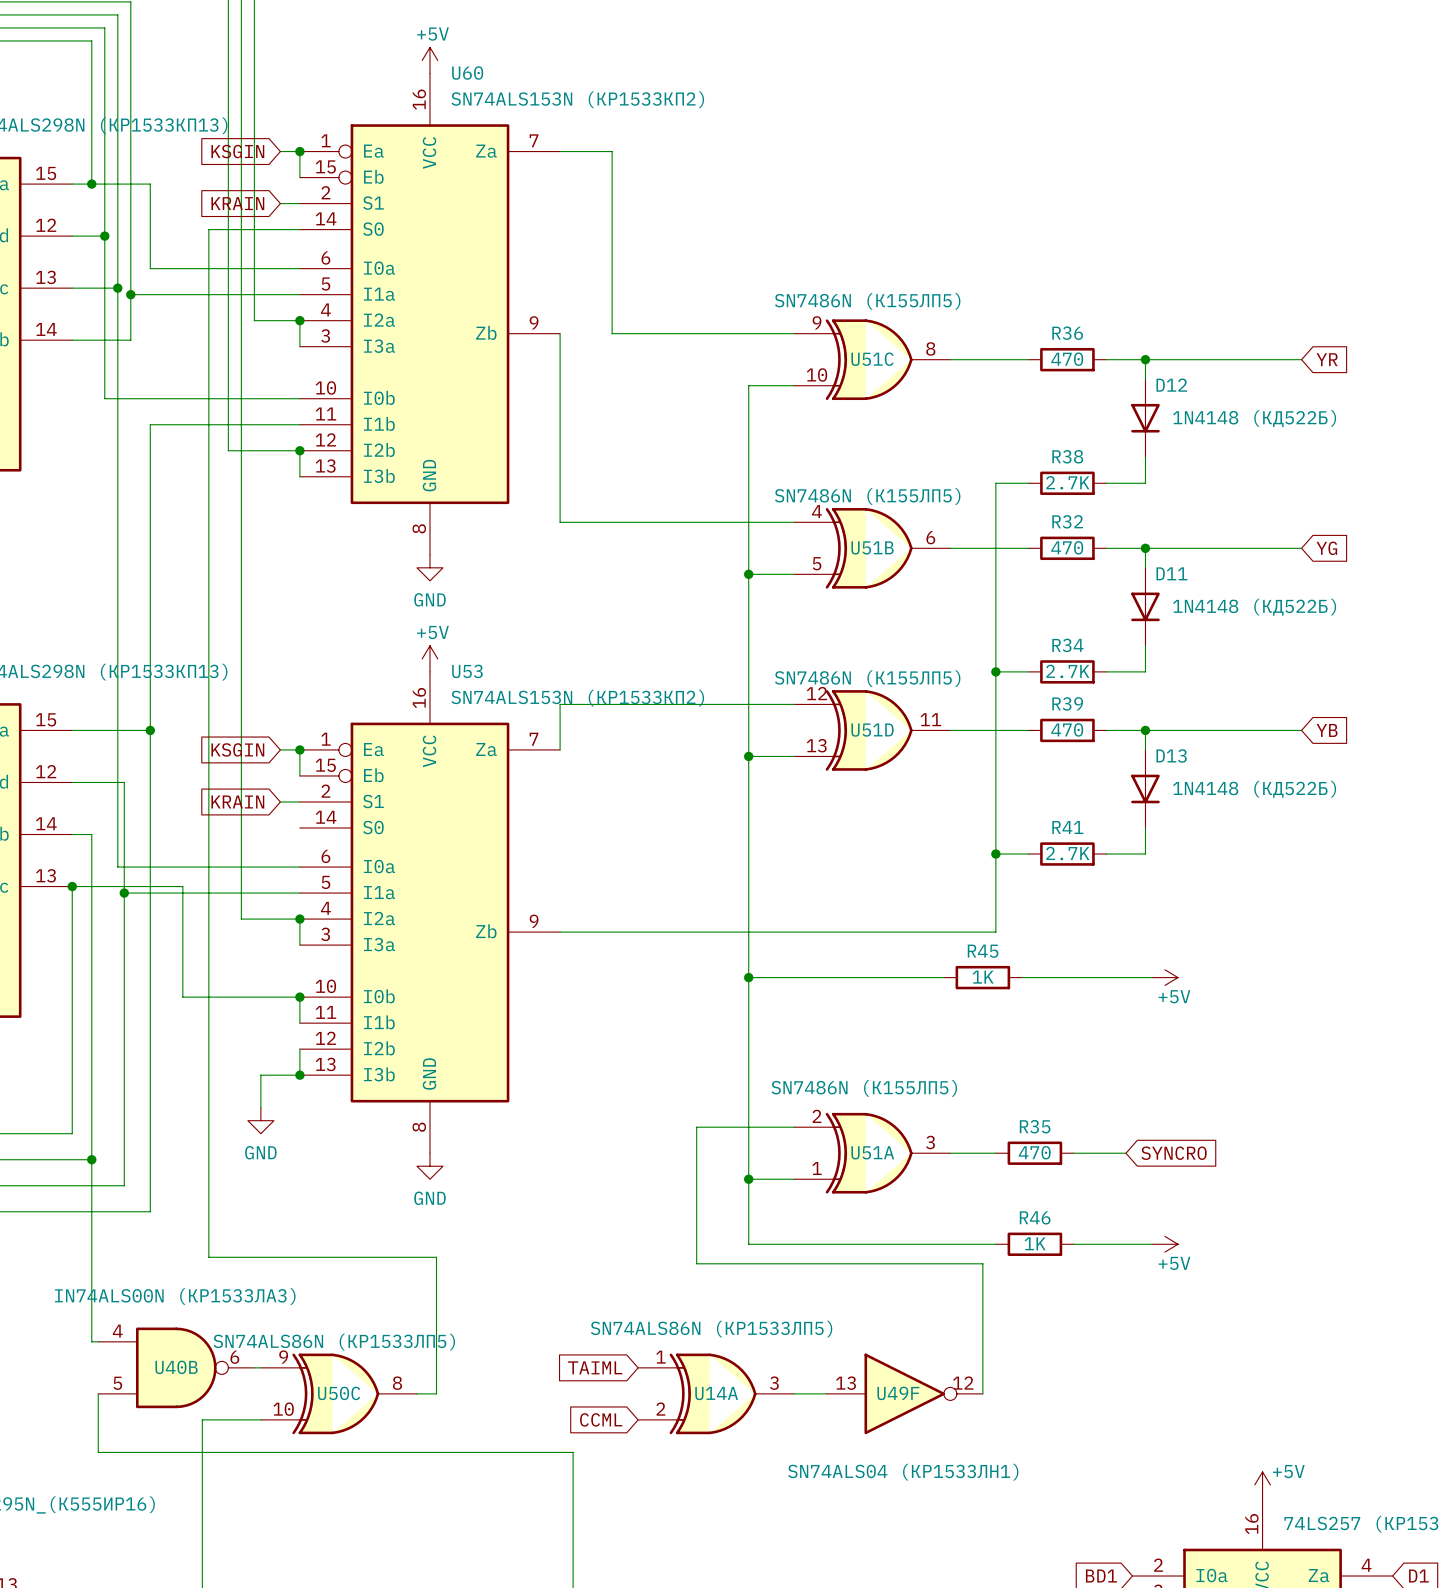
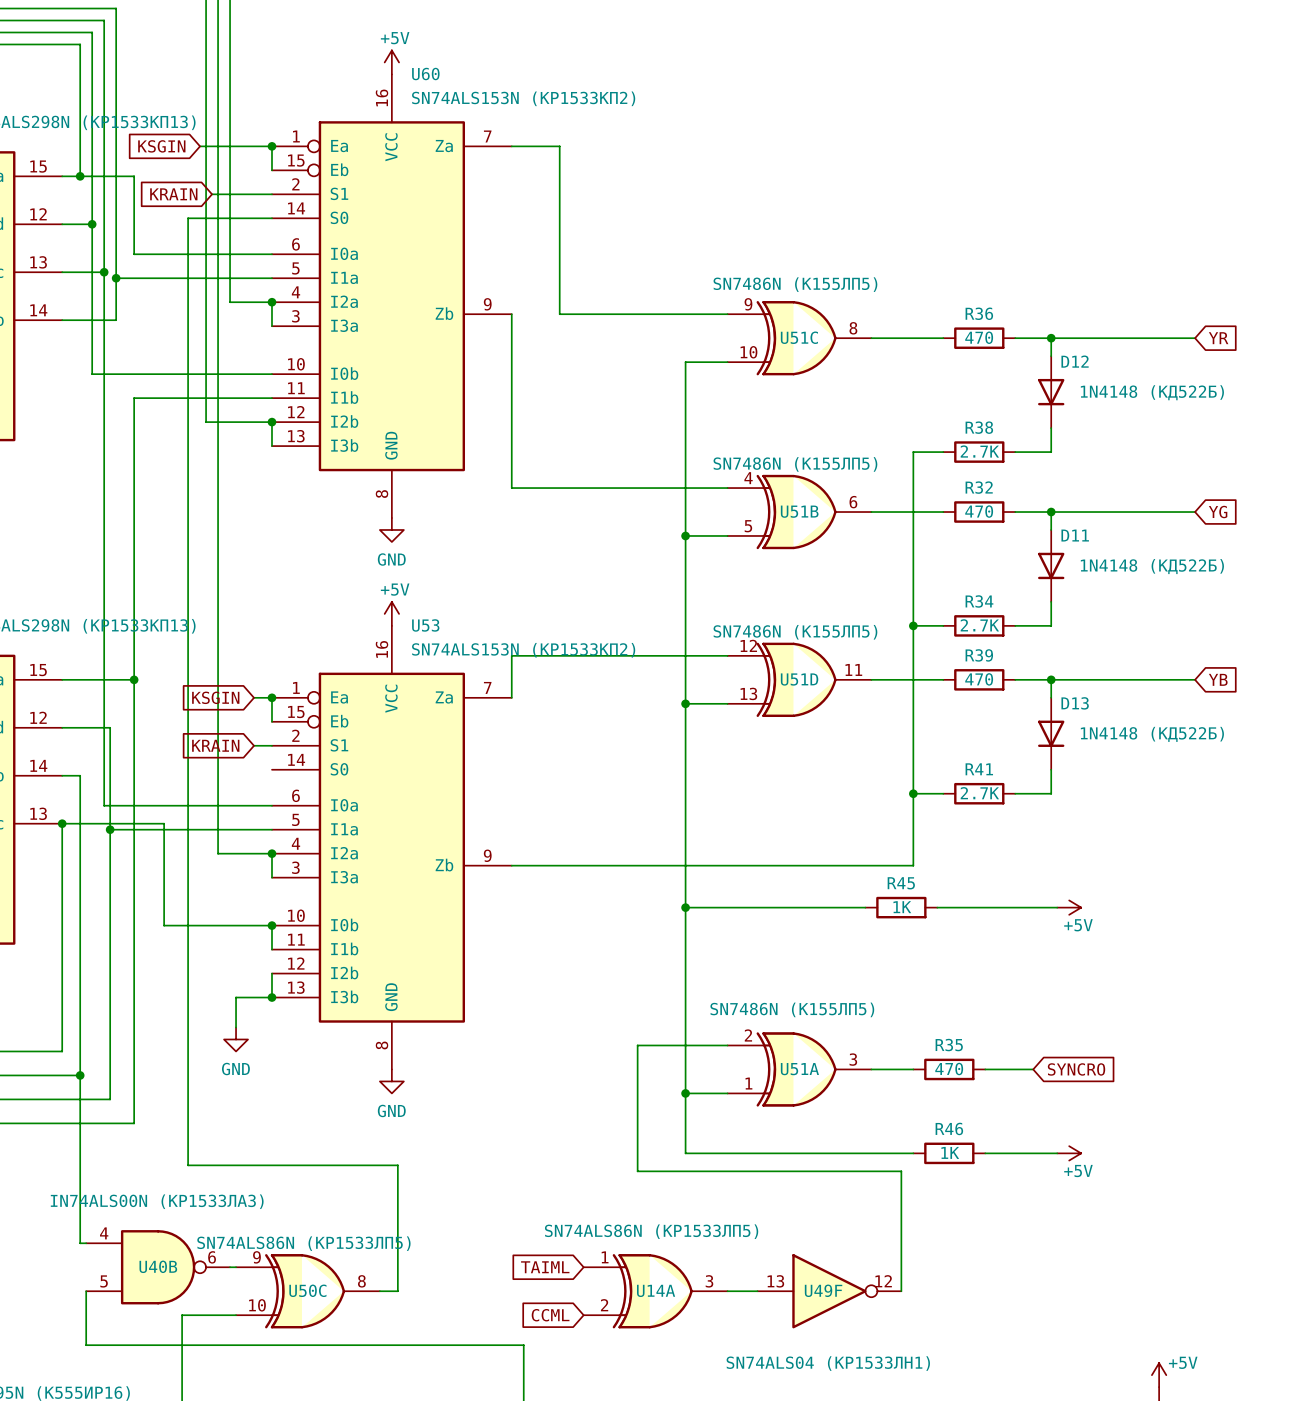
wire: none -> (200, 146) (254, 146)
global label position: KSGIN (237, 151) -> KSGIN (161, 146)
wire: none -> (212, 194) (254, 194)
global label position: KRAIN (237, 203) -> KRAIN (173, 194)

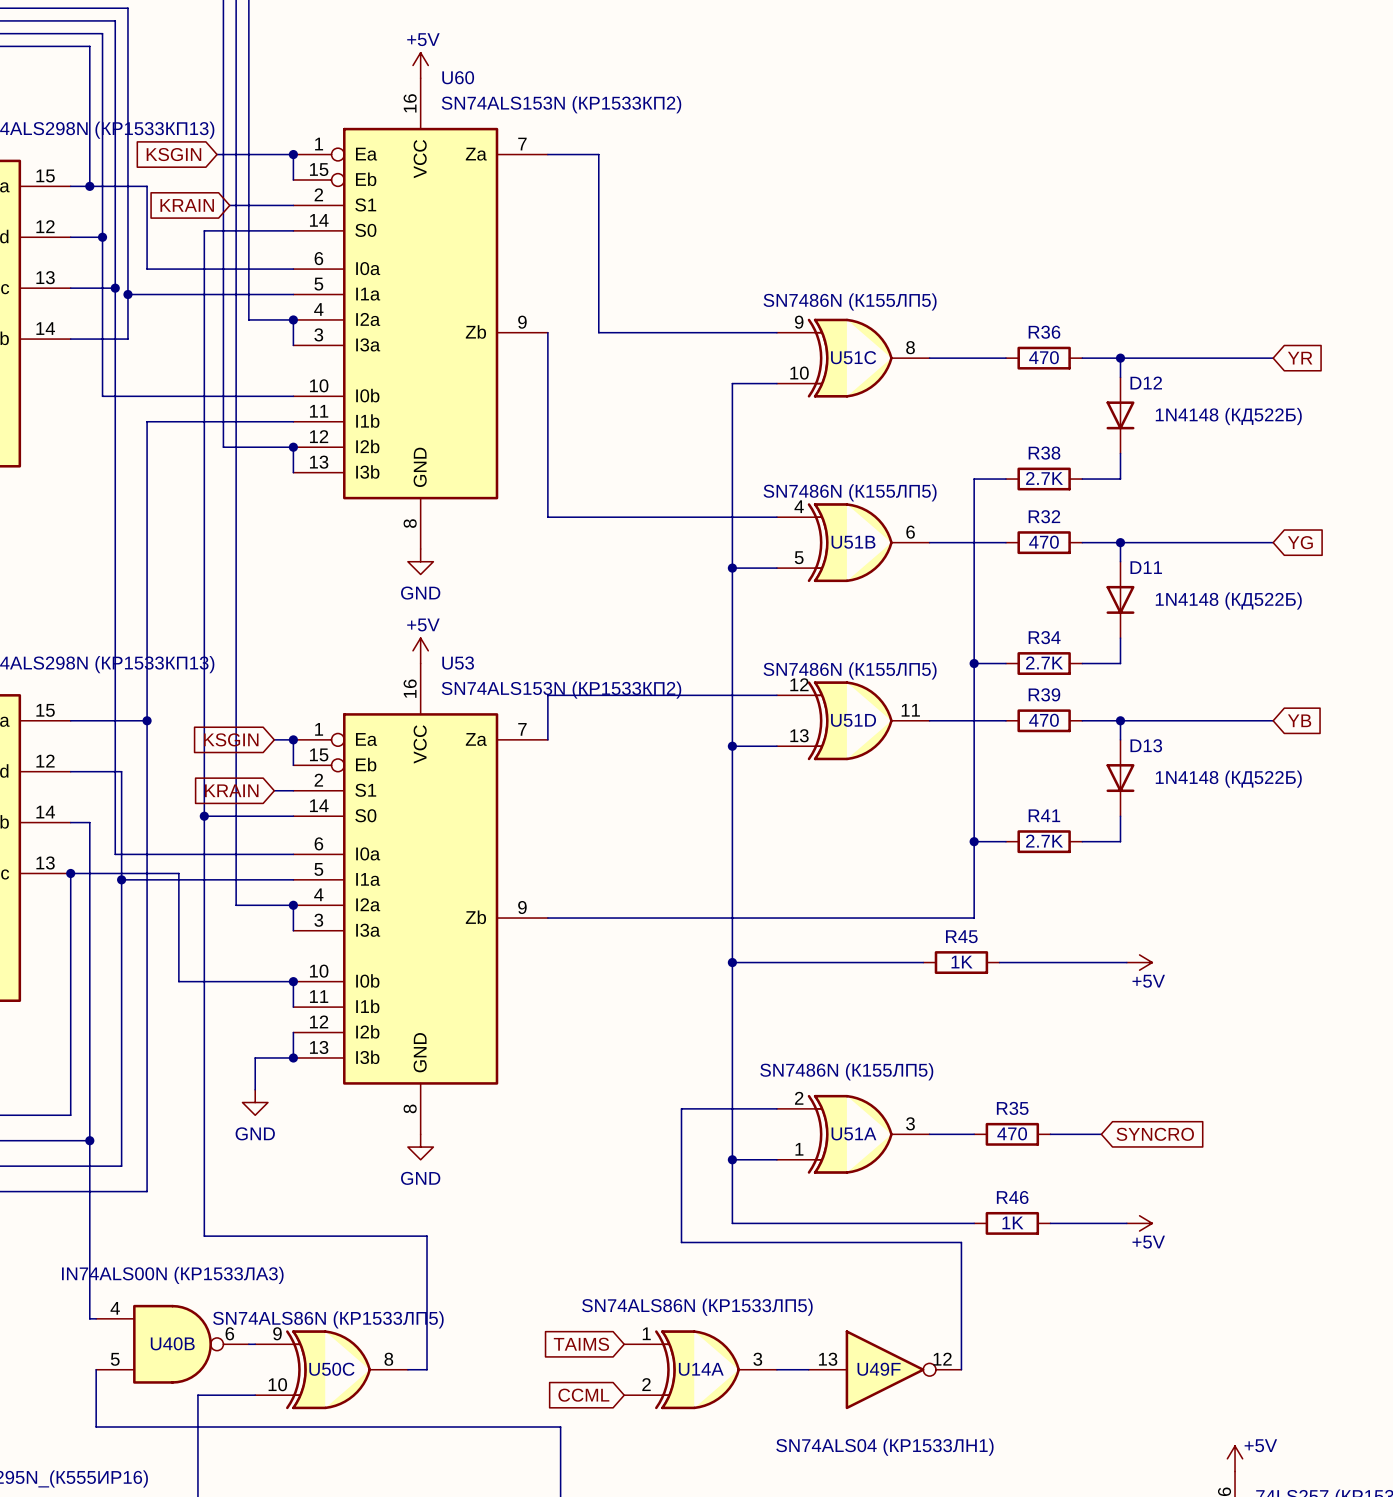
wire: none -> (204, 816) (293, 816)
junction: none -> (204, 816)
global label: TAIML (545, 1267) -> TAIMS (581, 1344)

